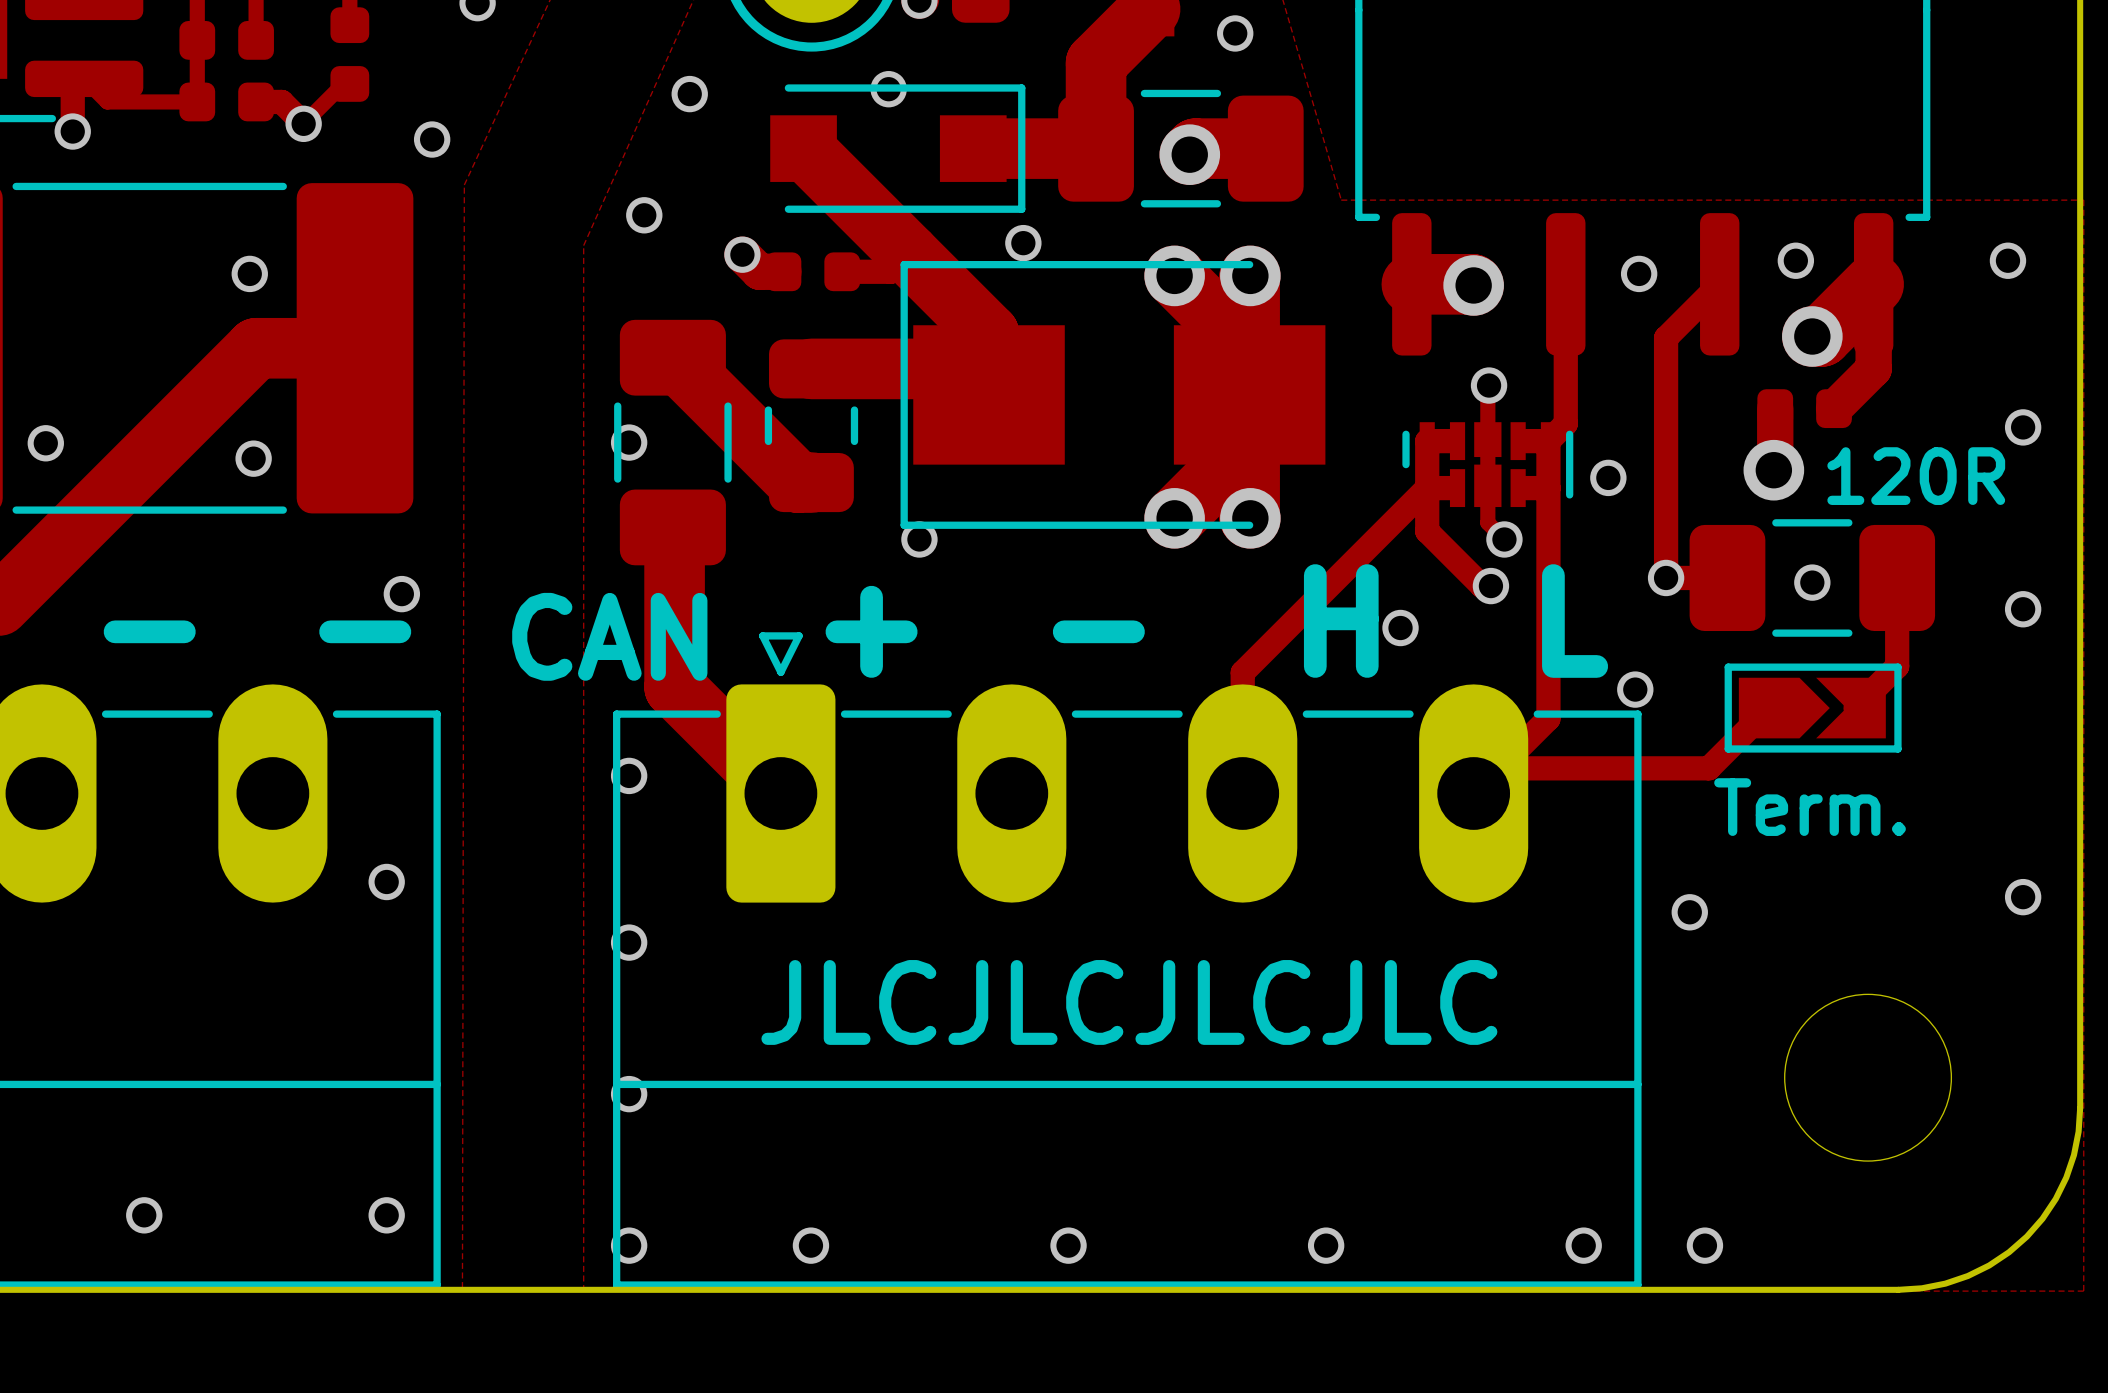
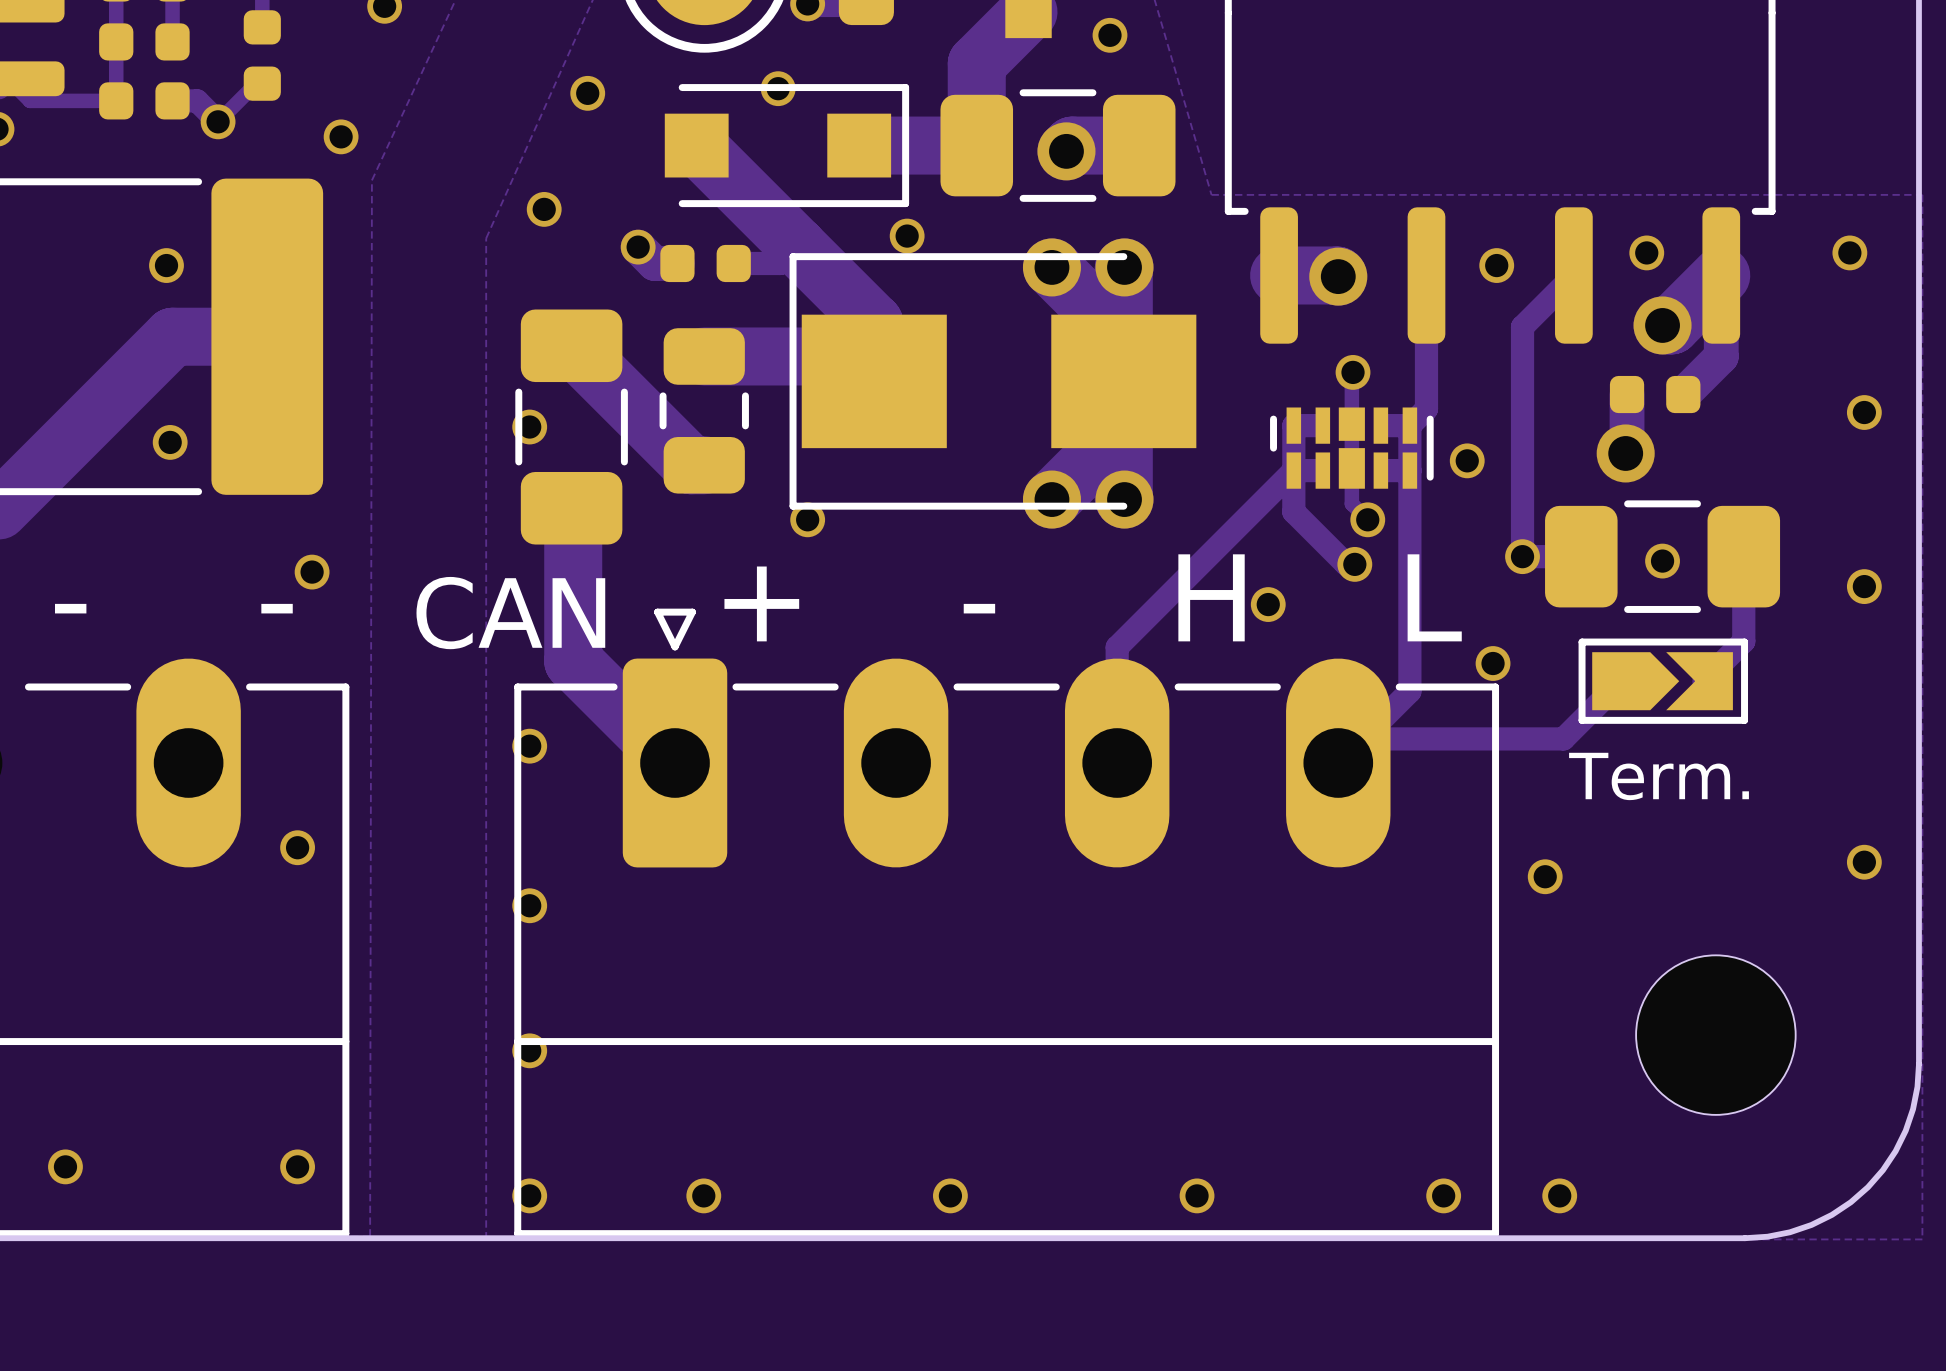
text: 120R (1916, 476) -> none
text: JLCJLCJLCJLC (1129, 1002) -> none

